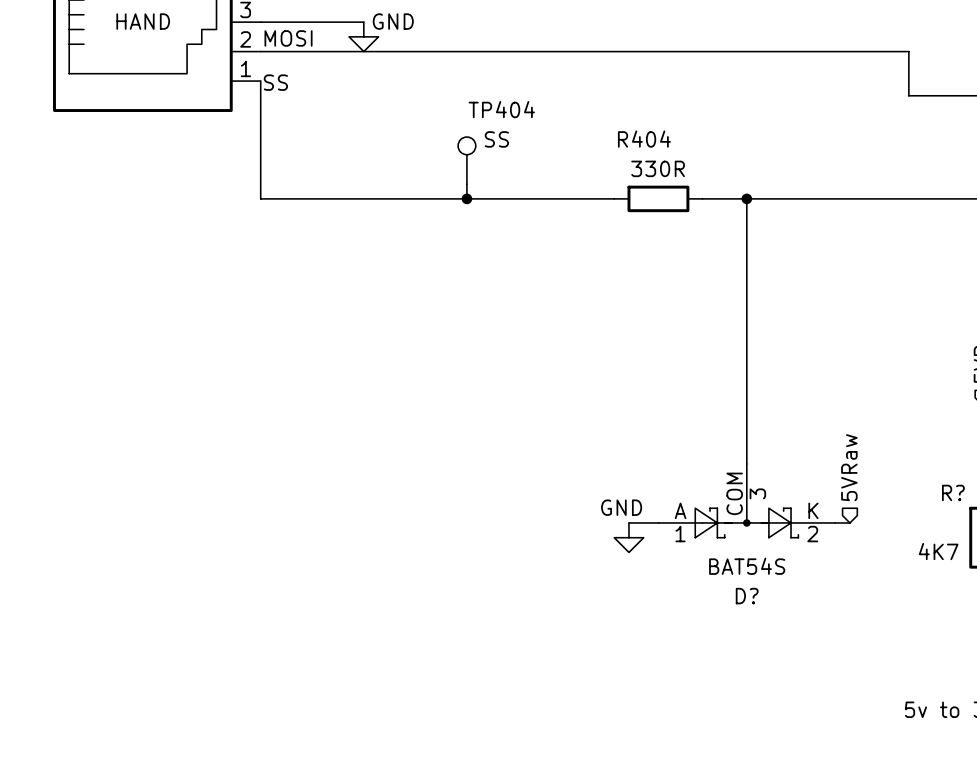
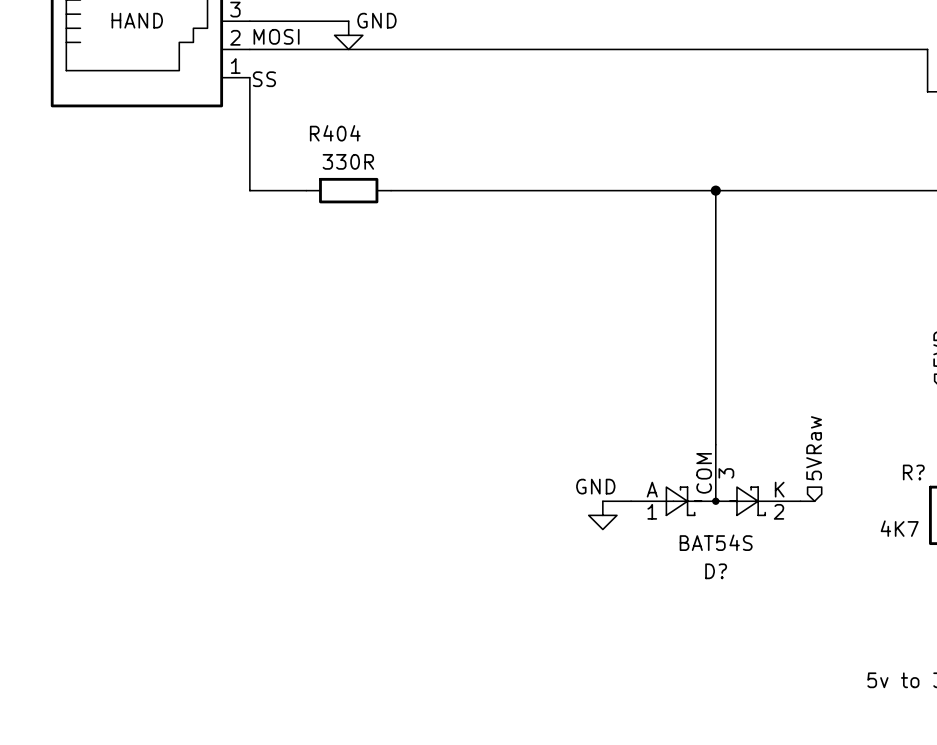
wire: (908, 51) (908, 95) (967, 95) -> (871, 49) (927, 49) (927, 91)
TP404: SS (466, 160) -> none
wire: (466, 184) (466, 198) -> none
wire: (319, 198) (408, 198) -> none
junction: (466, 198) -> none
wire: none -> (588, 190) (673, 190)
R404 position: (658, 198) -> (348, 190)

